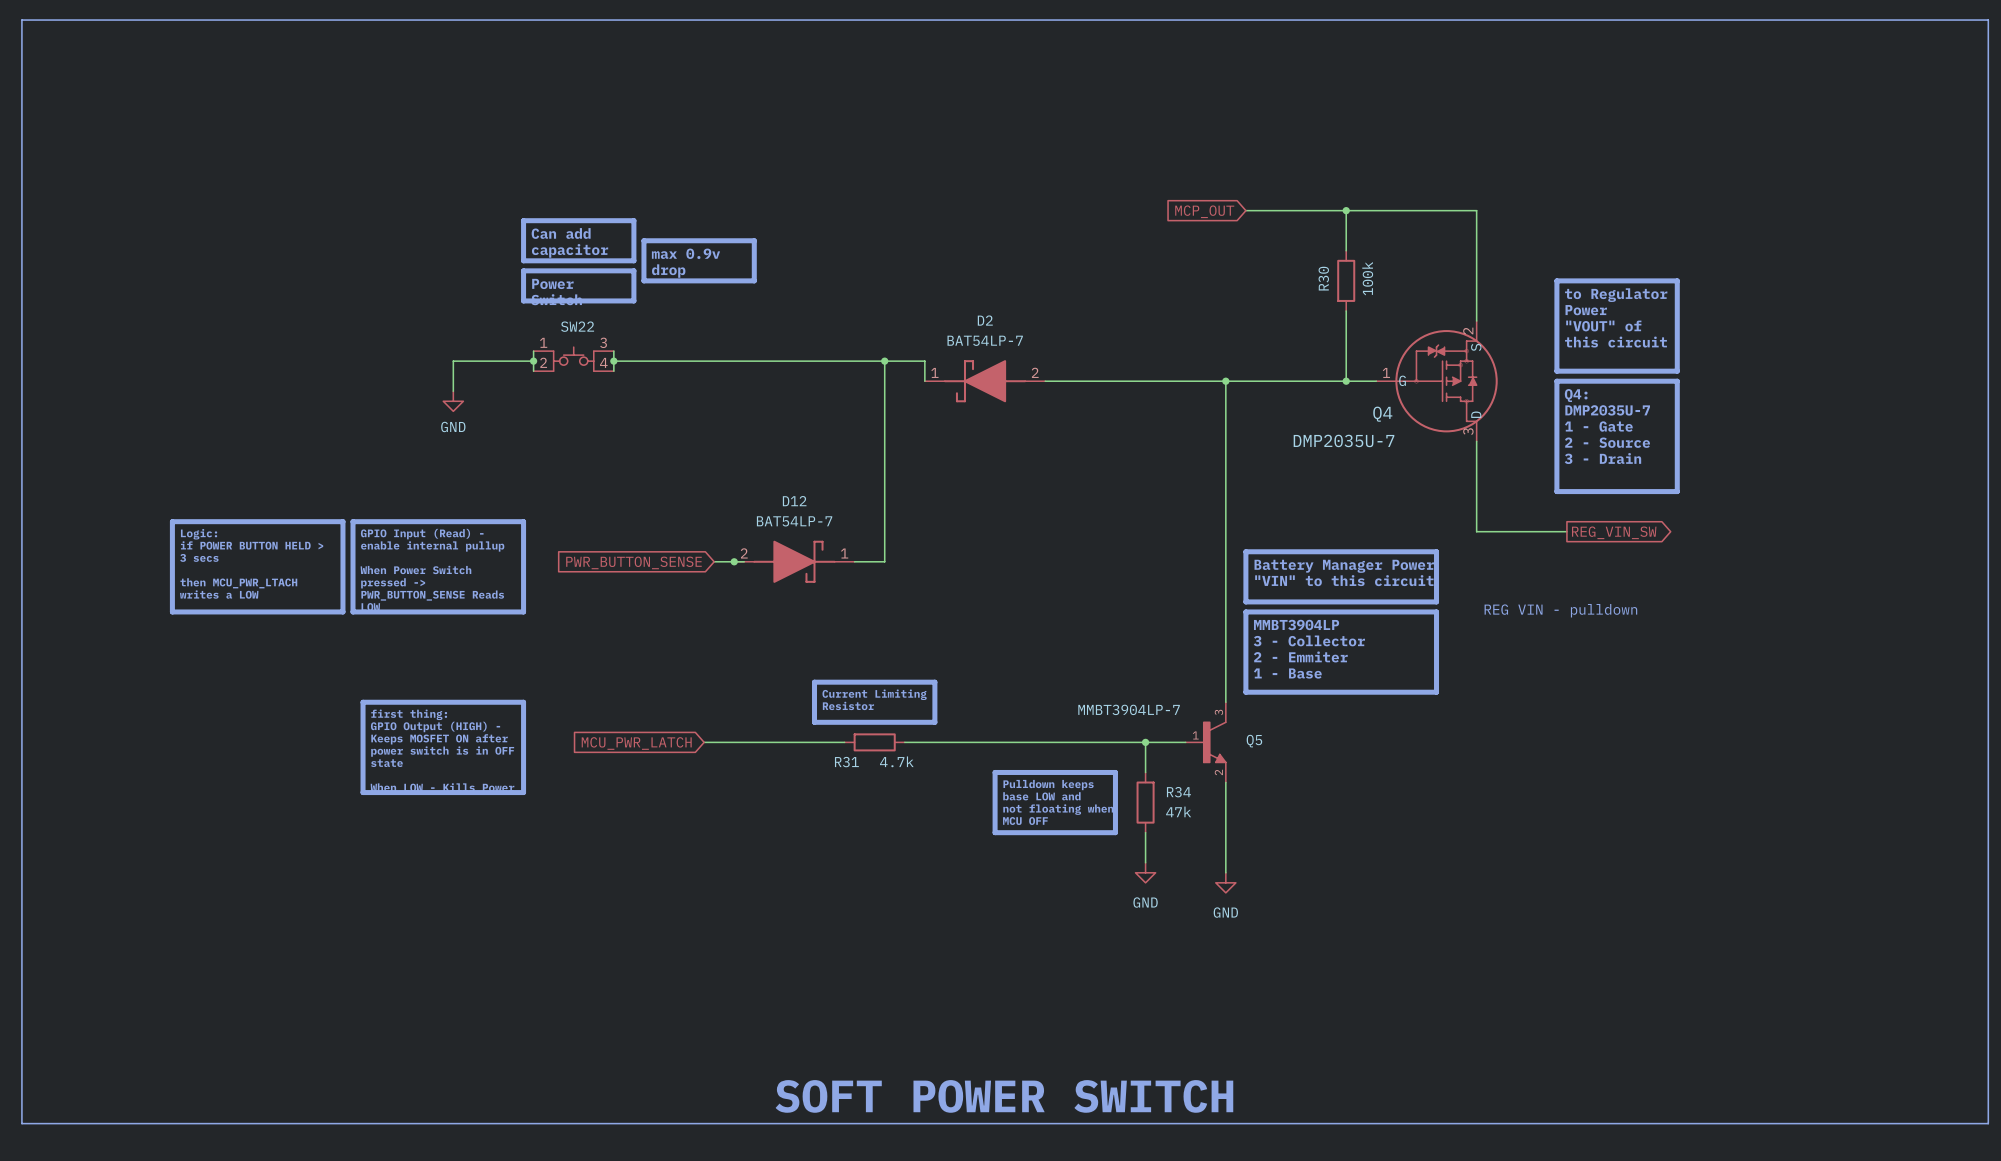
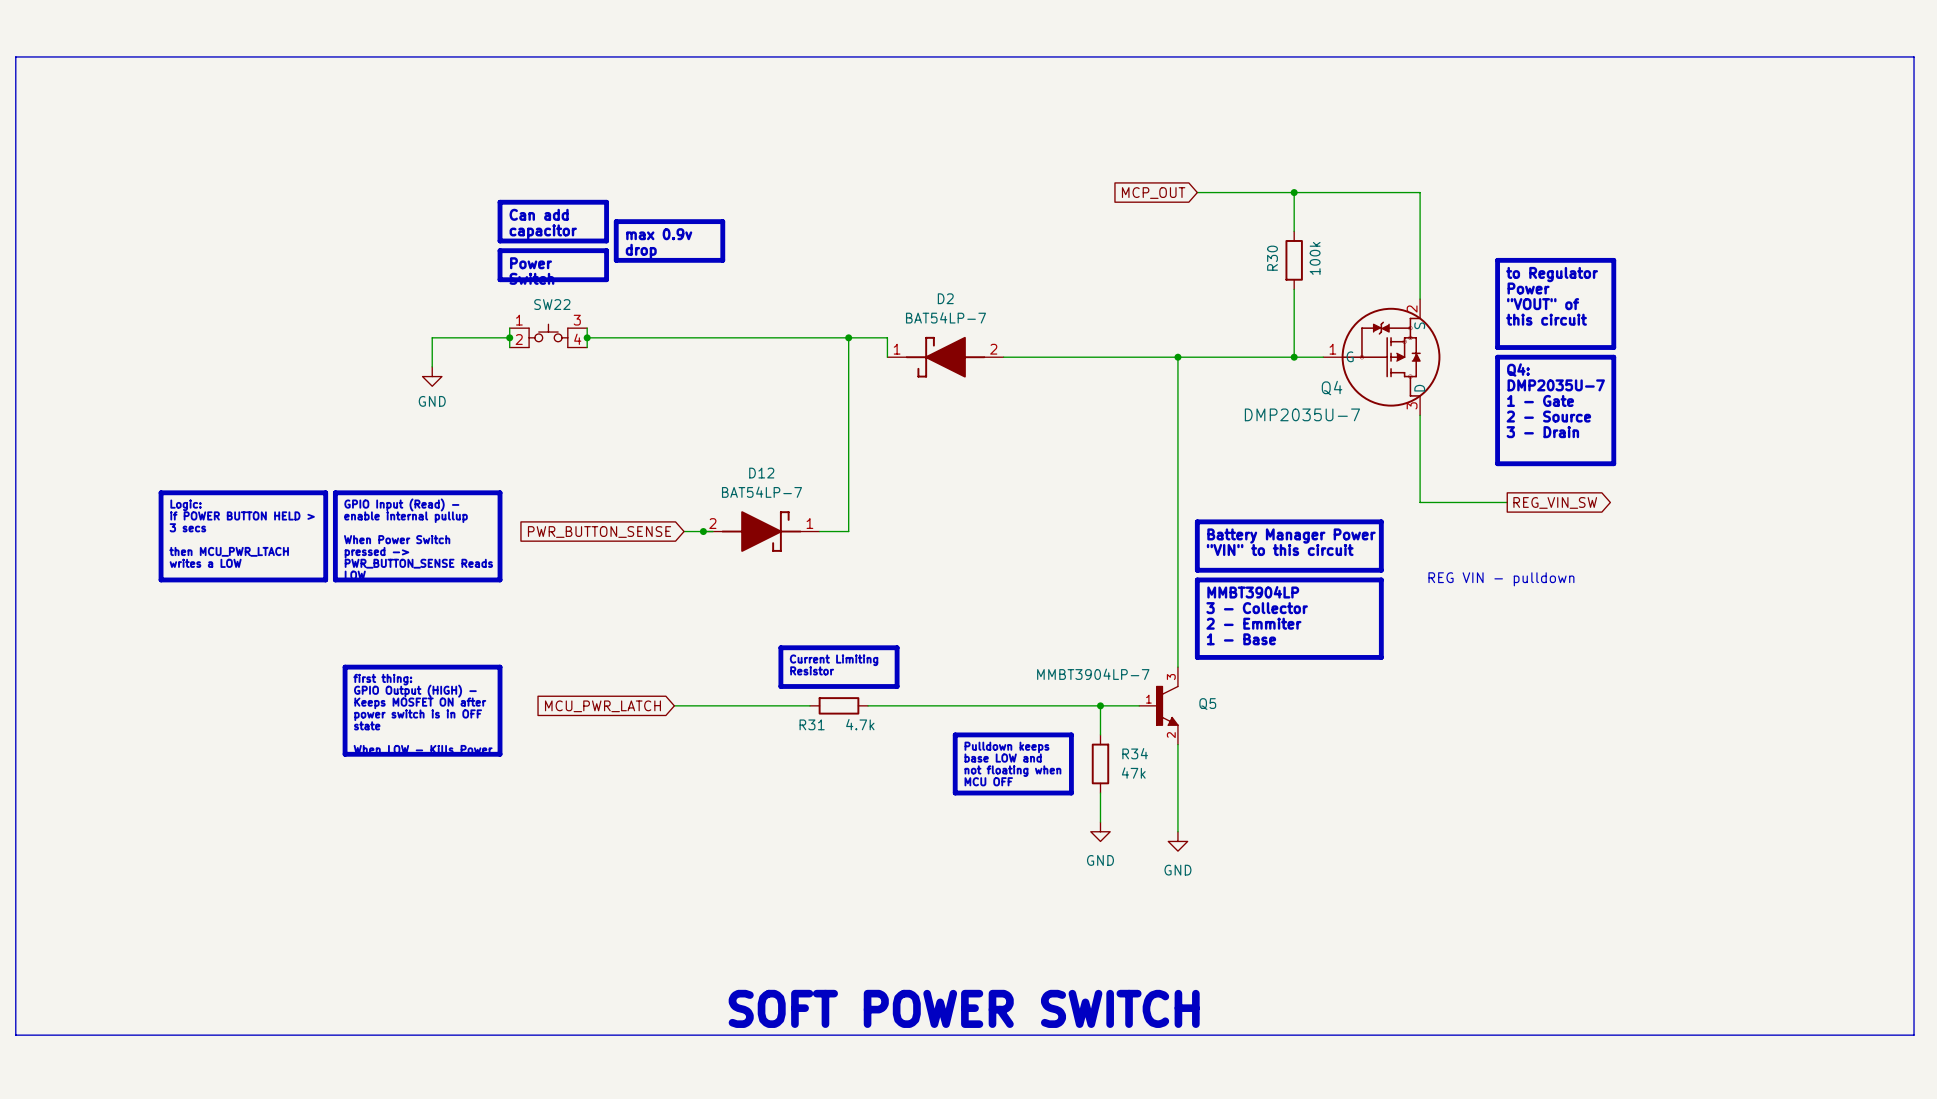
line: (21, 70) (21, 20) (1988, 20) (1988, 70) -> (15, 56) (1914, 56)
line: (21, 1083) (21, 1123) (1988, 1123) (1988, 1083) -> (15, 1035) (1914, 1035)
text position: SOFT POWER SWITCH (1004, 1096) -> SOFT POWER SWITCH (964, 1008)

